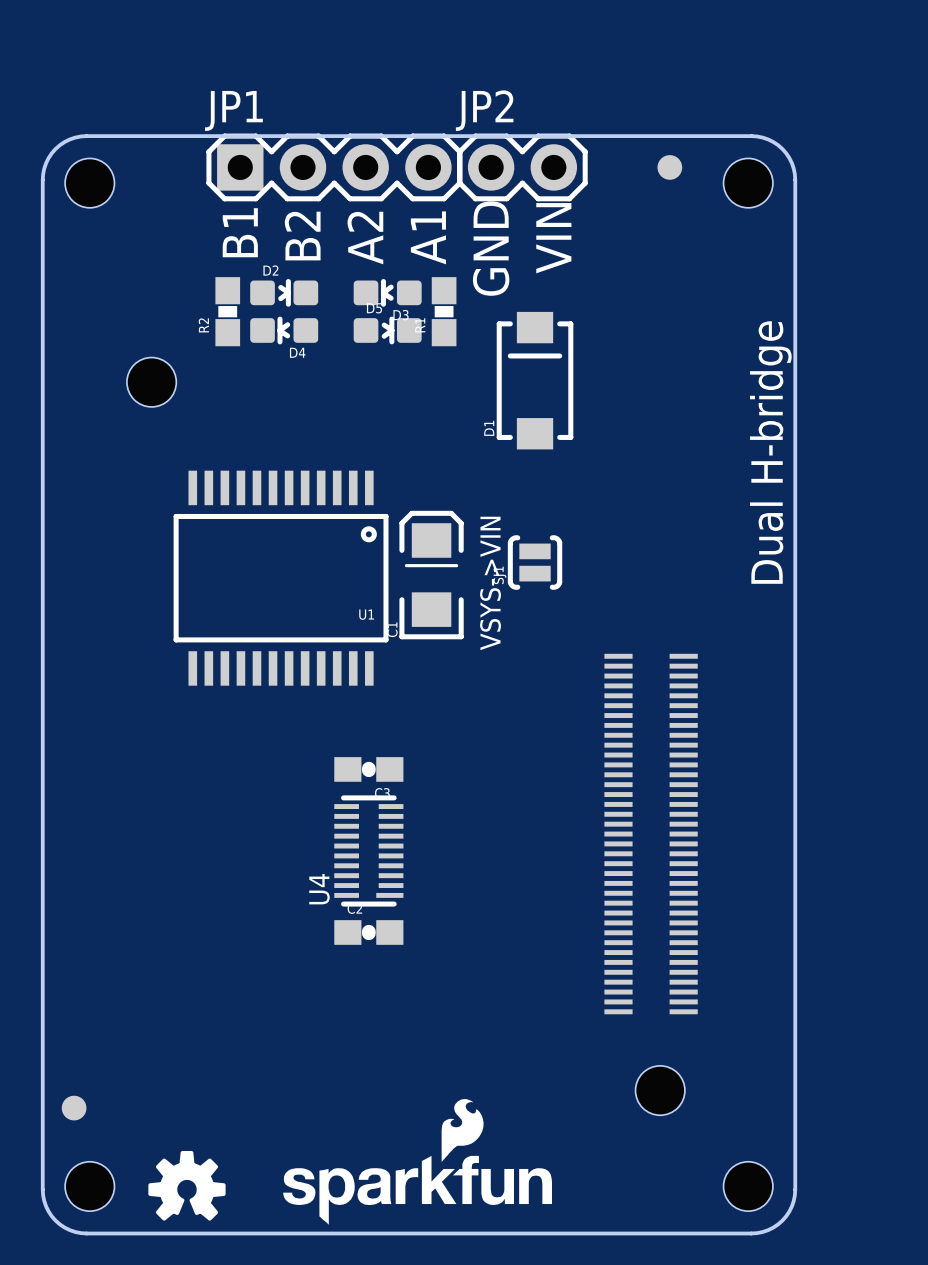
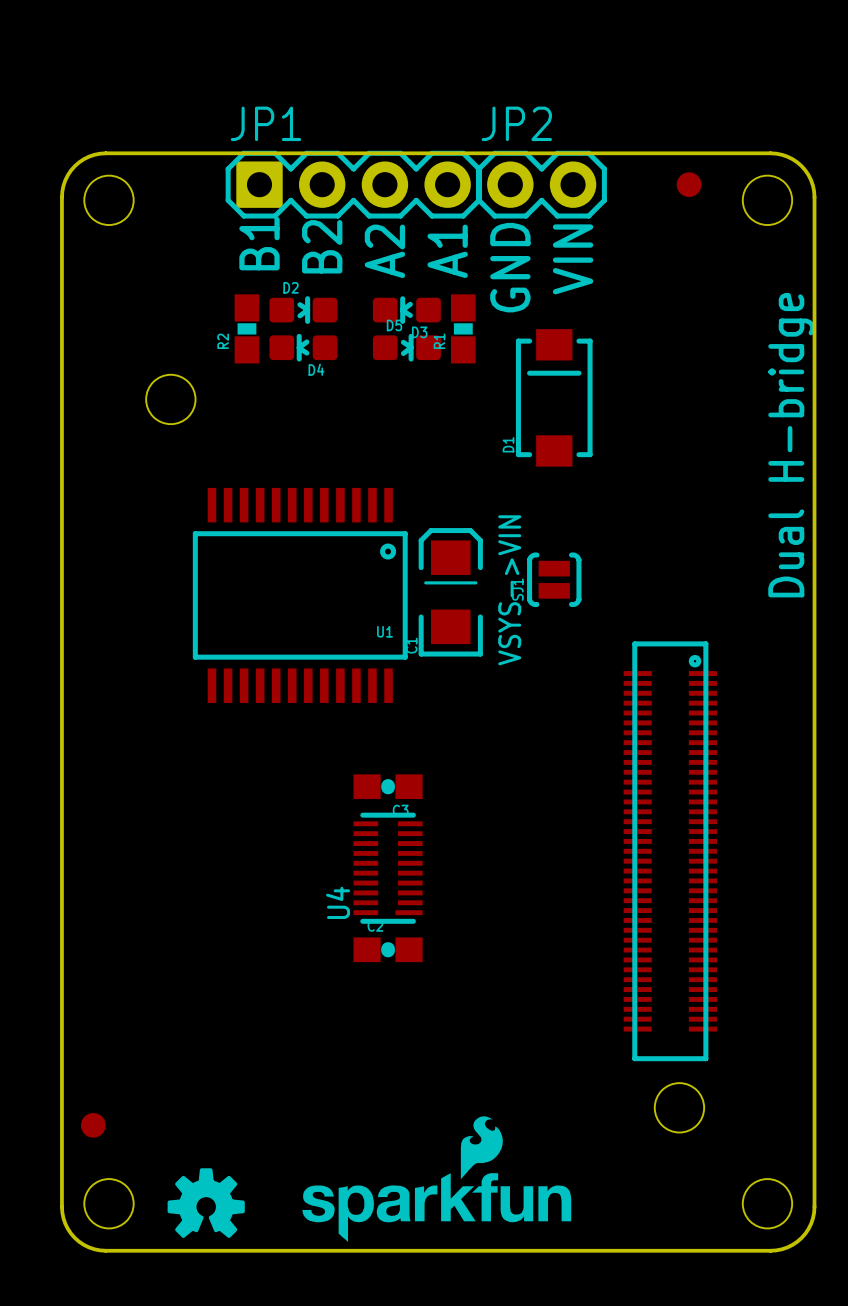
part footprint: [604, 653, 698, 1015] -> [623, 641, 717, 1062]

